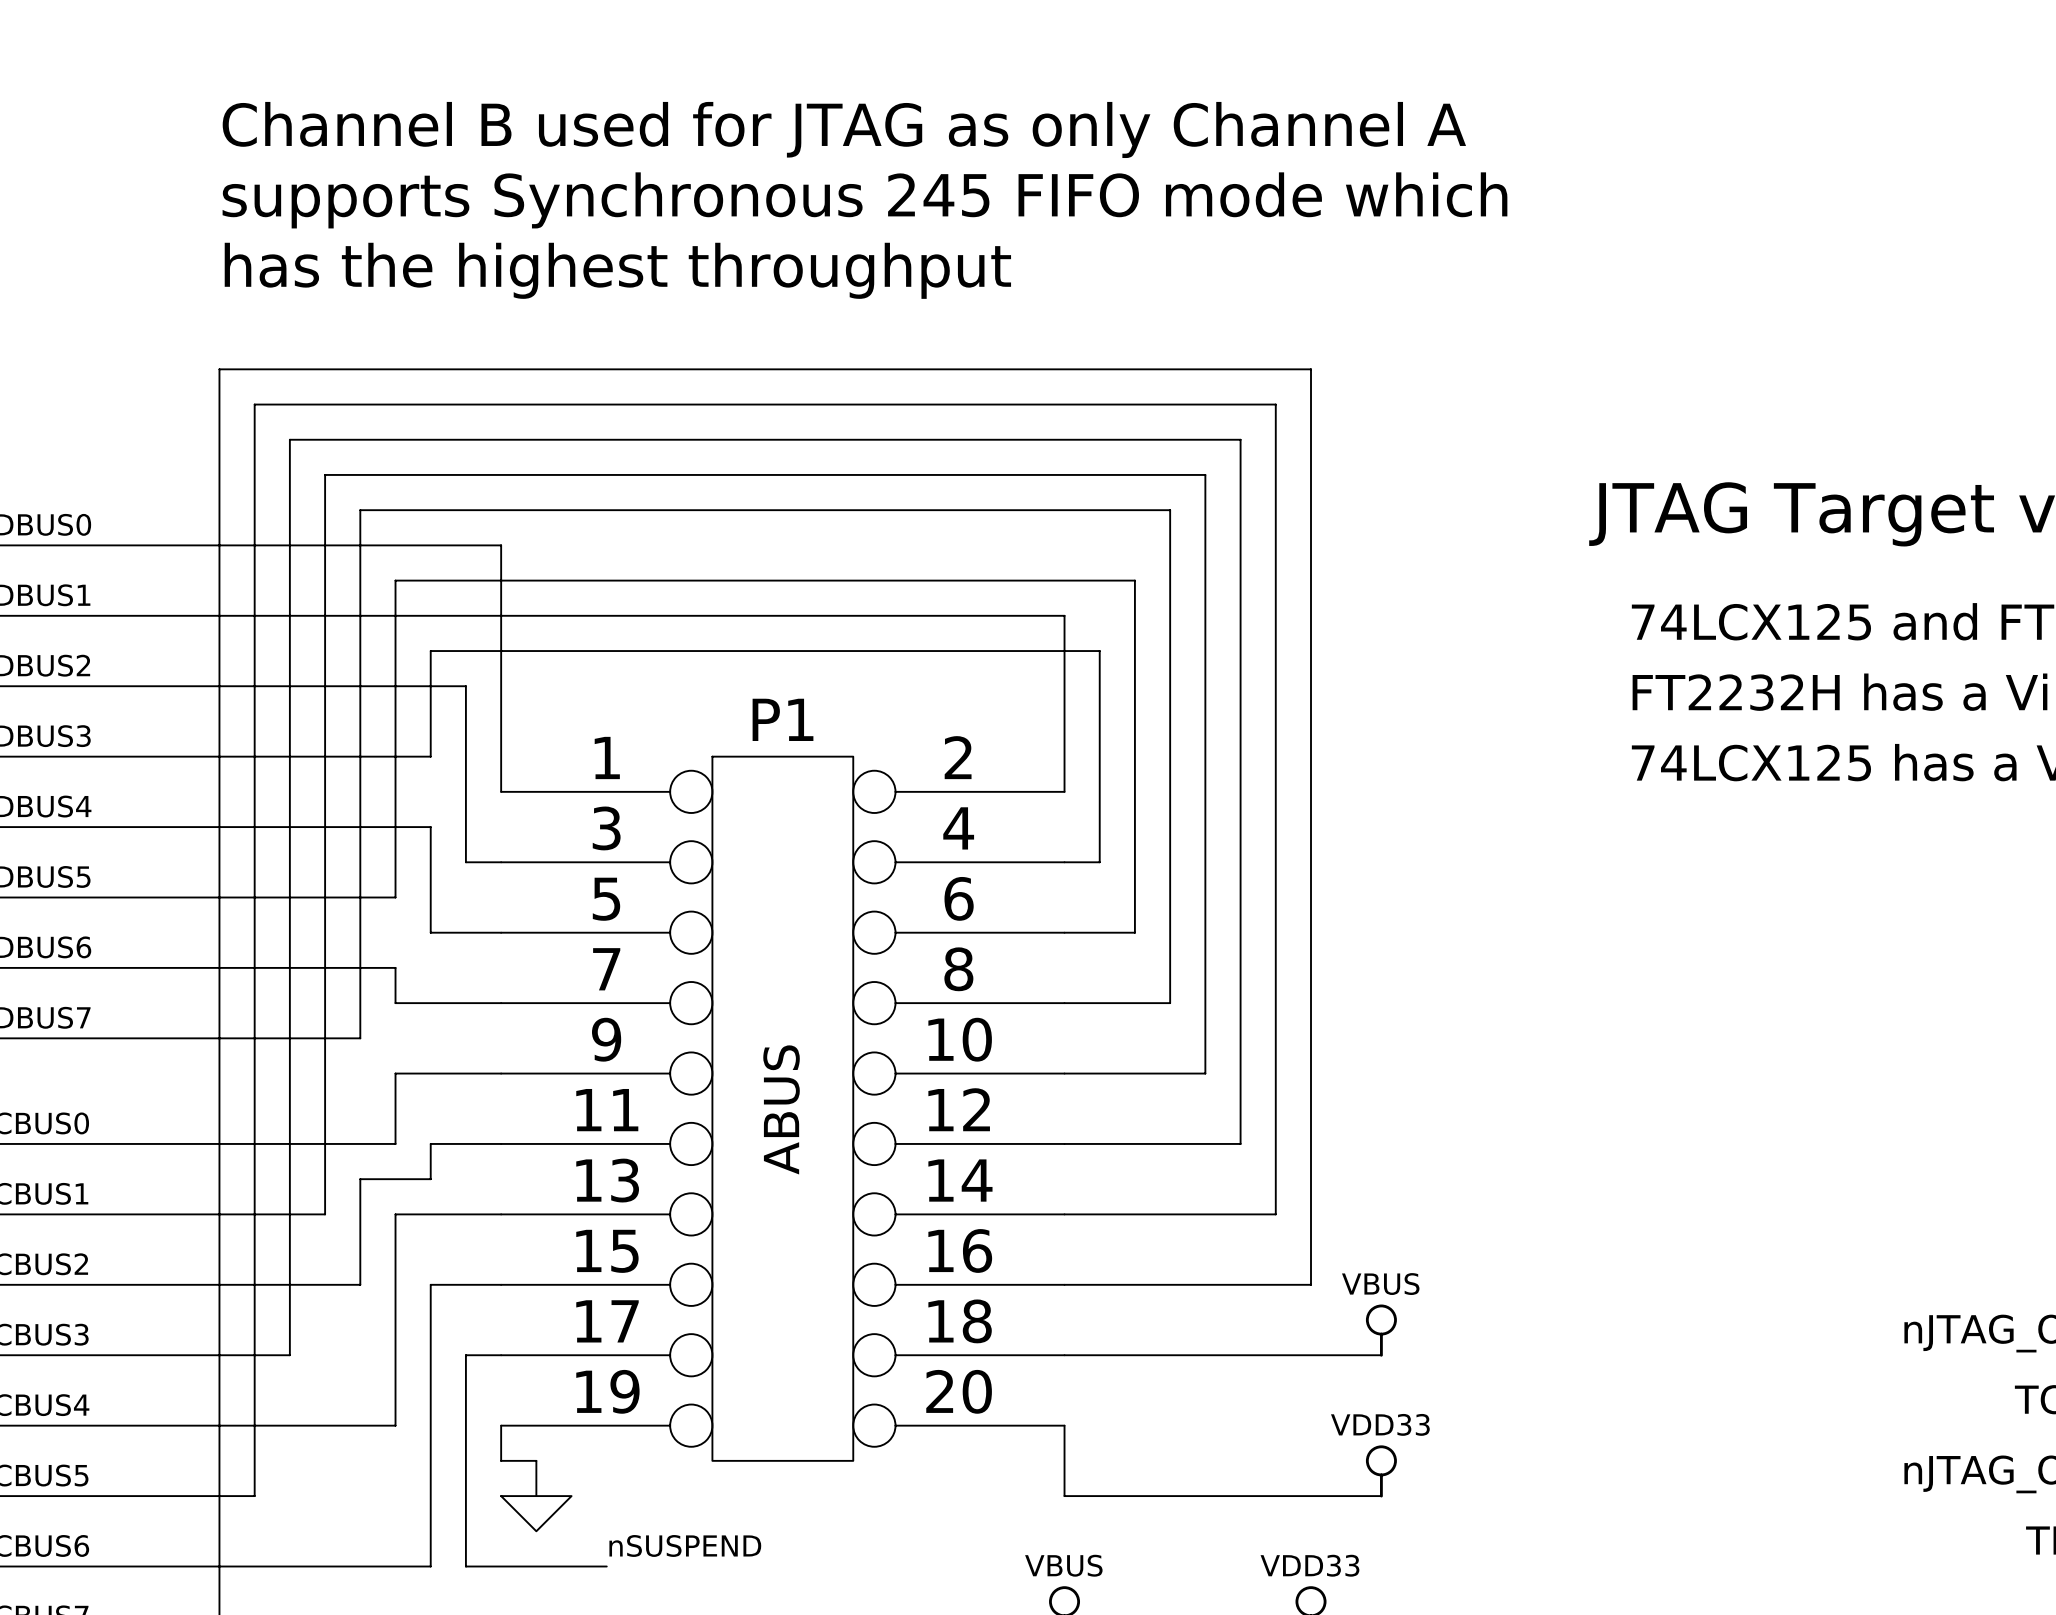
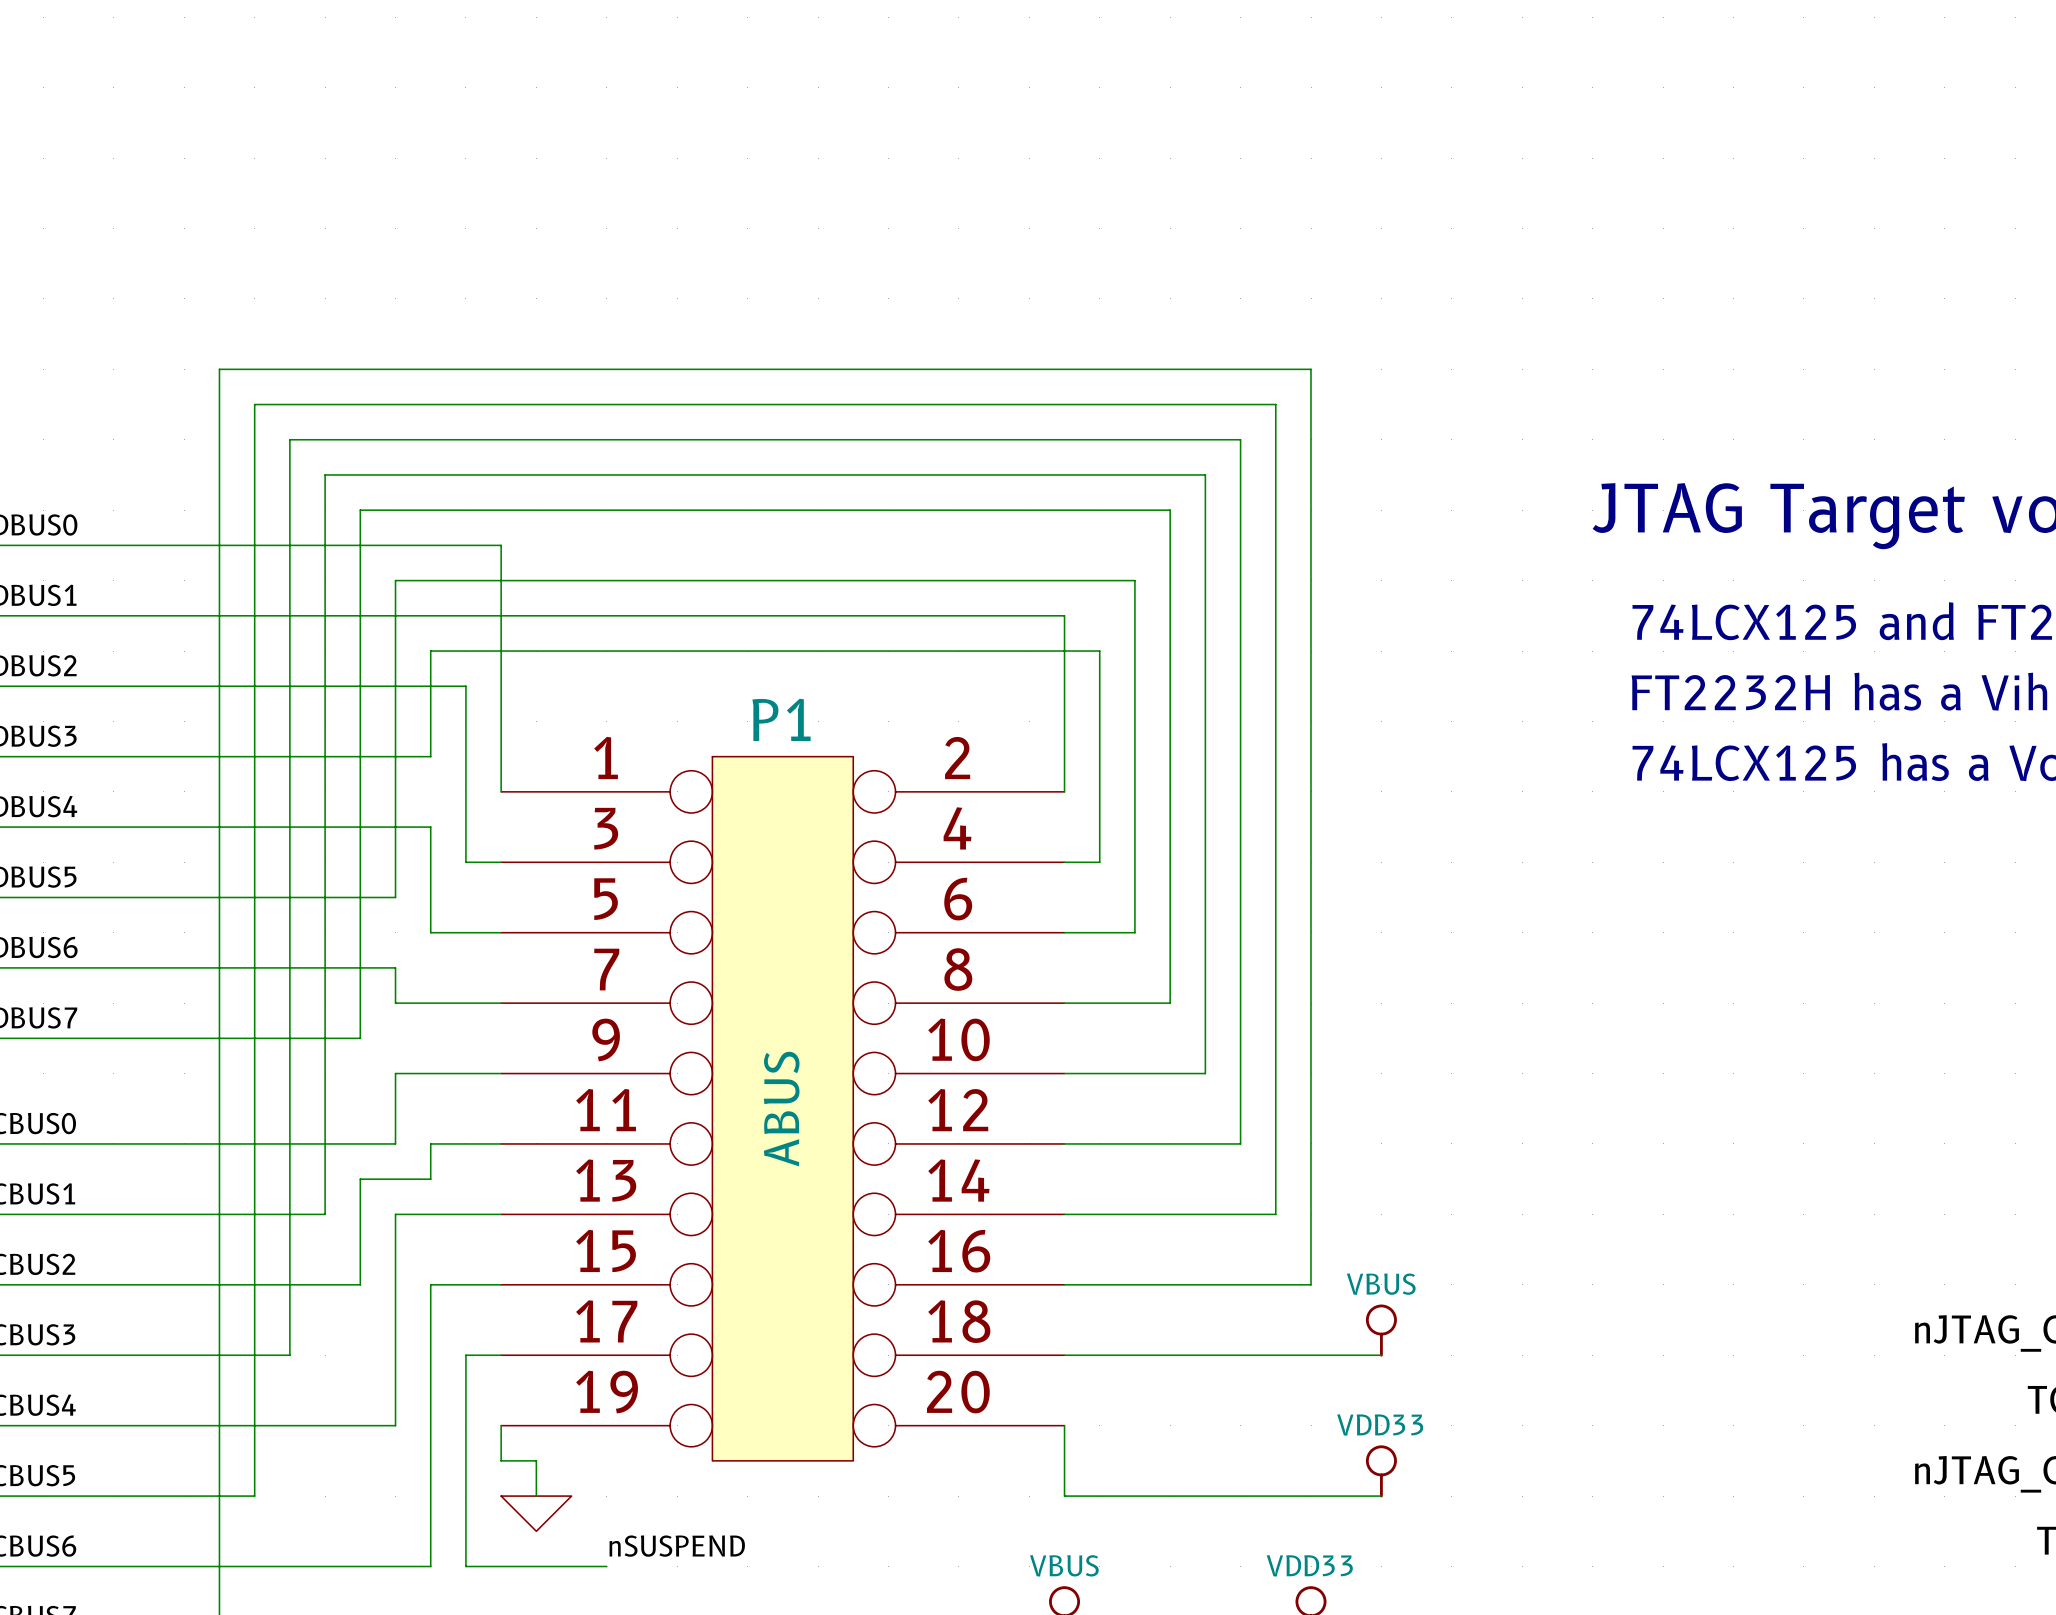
text: Channel B used for JTAG as only Channel A (844, 129) -> none
text: supports Synchronous 245 FIFO mode which (864, 200) -> none
text: has the highest throughput (617, 270) -> none

